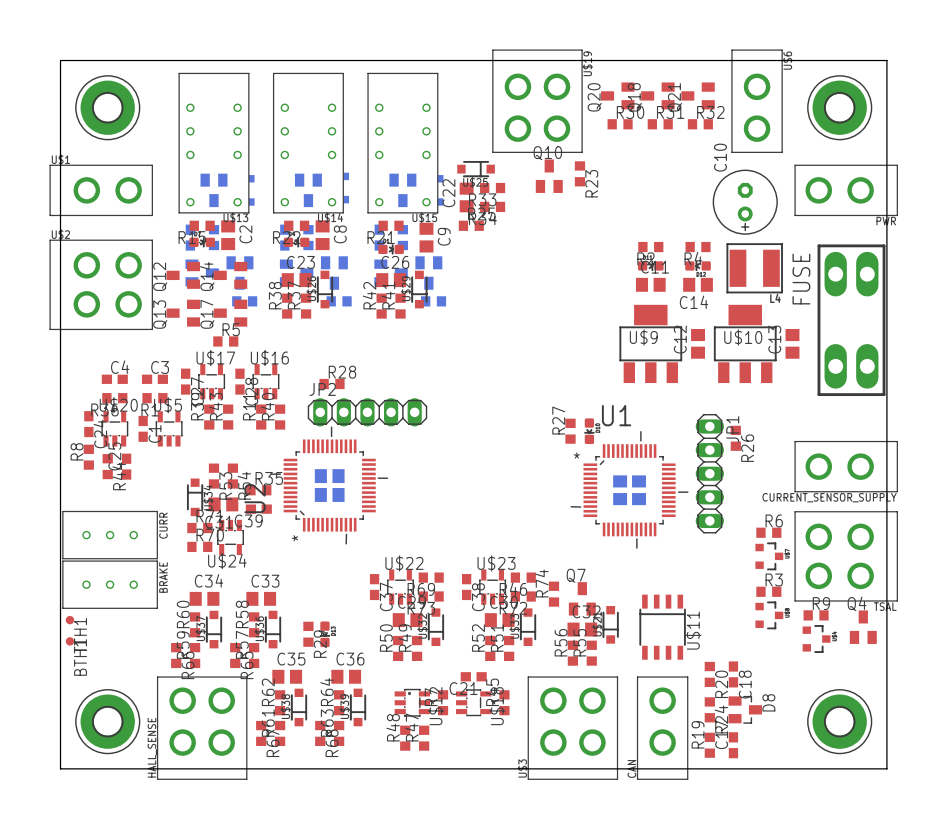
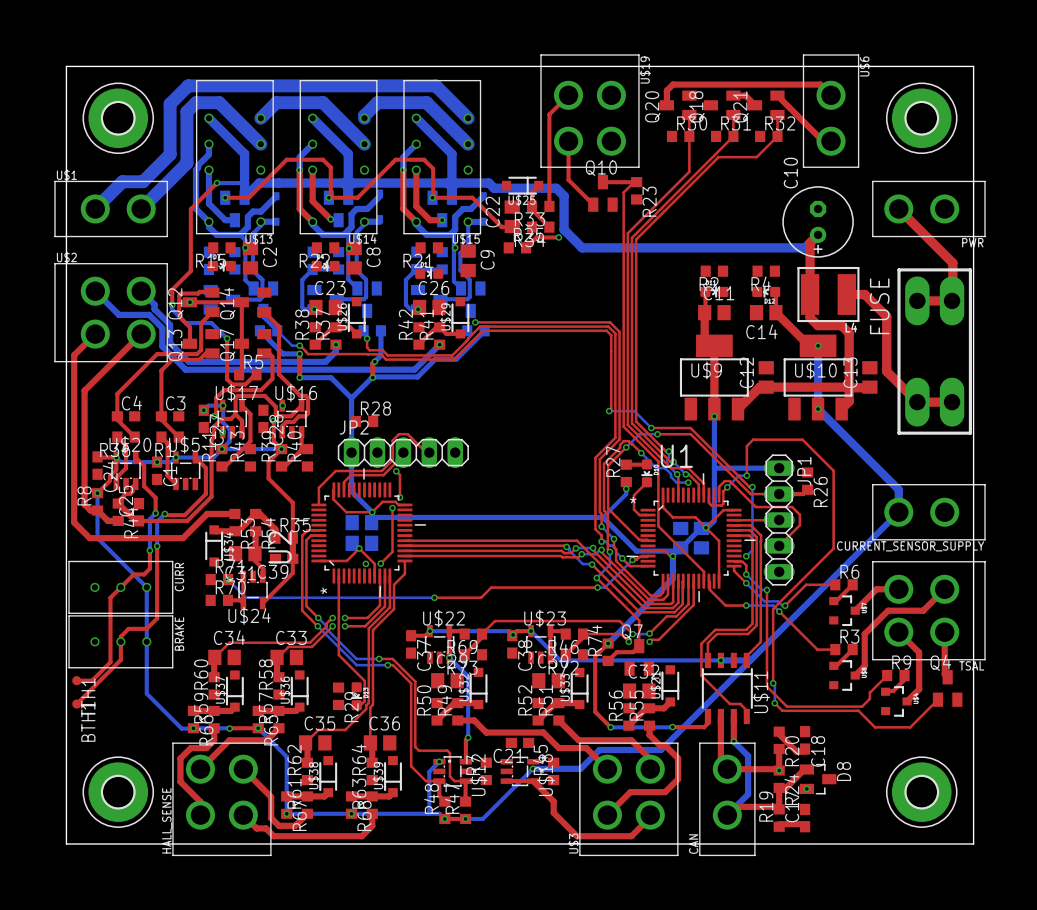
top track: none -> (568, 95) (549, 114) (549, 206)
top track: none -> (831, 95) (820, 84) (672, 84) (666, 90) (666, 105)
top track: none -> (733, 95) (745, 95) (755, 105)
top track: none -> (777, 95) (823, 141) (831, 141)
top track: none -> (689, 115) (689, 136)
top track: none -> (733, 115) (733, 136) (631, 237) (631, 423) (670, 461) (673, 461)
top track: none -> (777, 115) (777, 136) (756, 157) (718, 157) (636, 239) (636, 421) (666, 451) (668, 451)
bottom track: none -> (208, 118) (244, 153) (244, 197) (259, 183) (343, 183) (348, 187)
bottom track: none -> (260, 118) (276, 102) (323, 102) (364, 144)
bottom track: none -> (312, 118) (348, 153) (348, 197)
bottom track: none -> (364, 118) (364, 115) (377, 102) (426, 102) (468, 144)
bottom track: none -> (416, 118) (451, 153) (451, 197)
bottom track: none -> (468, 118) (435, 85) (188, 85) (170, 104) (170, 154) (142, 181) (122, 181) (95, 208)
top track: none -> (689, 136) (689, 171) (627, 233) (627, 424) (671, 468) (688, 468) (704, 483) (703, 495)
top track: none -> (568, 141) (568, 179) (593, 204)
bottom track: none -> (208, 144) (208, 154) (196, 169) (196, 208) (208, 221) (208, 227) (216, 234) (240, 234)
bottom track: none -> (260, 144) (219, 102) (196, 102) (186, 111) (186, 163) (141, 208)
bottom track: none -> (312, 144) (299, 157) (299, 170)
bottom track: none -> (416, 144) (403, 157) (403, 170)
bottom track: none -> (208, 170) (208, 203) (225, 220) (234, 220)
top track: none -> (299, 170) (299, 208) (312, 221)
via: none -> (299, 170)
top track: none -> (312, 170) (312, 201) (330, 219)
top track: none -> (403, 170) (403, 208) (416, 221)
via: none -> (403, 170)
top track: none -> (416, 170) (416, 206) (430, 220) (442, 220)
top track: none -> (602, 182) (634, 182)
top track: none -> (634, 182) (623, 192) (623, 426) (658, 461) (658, 526) (704, 571) (703, 581)
top track: none -> (216, 183) (190, 209) (190, 271) (172, 289) (172, 304)
bottom track: none -> (216, 183) (244, 183)
via: none -> (216, 183)
bottom track: none -> (451, 183) (488, 183) (494, 188) (556, 188) (564, 196) (564, 229) (582, 247) (805, 247) (818, 234)
top track: none -> (538, 185) (532, 192) (532, 209) (549, 227)
bottom track: none -> (348, 187) (352, 183) (447, 183) (451, 188)
bottom track: none -> (276, 196) (261, 211) (253, 211) (247, 216) (247, 227) (240, 234)
bottom track: none -> (380, 196) (367, 208) (356, 208) (351, 214) (351, 227) (343, 234) (323, 234) (312, 224) (312, 221)
bottom track: none -> (483, 196) (470, 208) (462, 208) (455, 216) (455, 229)
top track: none -> (225, 197) (248, 197) (286, 159) (323, 159) (330, 167) (330, 195) (328, 197) (357, 197) (395, 159) (424, 159) (433, 168) (432, 197) (472, 197) (501, 227) (512, 226)
via: none -> (225, 197)
via: none -> (328, 197)
via: none -> (432, 197)
top track: none -> (898, 208) (952, 263) (952, 300) (917, 300)
via: none -> (330, 219)
via: none -> (442, 220)
bottom track: none -> (276, 221) (261, 221) (260, 225) (253, 233) (253, 270) (262, 279) (262, 297) (259, 299) (233, 299)
bottom track: none -> (380, 221) (364, 221) (364, 224) (356, 232) (356, 270) (366, 279) (366, 297) (364, 299) (336, 299)
bottom track: none -> (416, 221) (416, 224) (426, 234) (450, 234) (455, 229)
bottom track: none -> (483, 221) (468, 221) (468, 245) (460, 253) (460, 270) (469, 279) (469, 297) (467, 299) (440, 299)
bottom track: none -> (348, 230) (348, 279) (357, 288)
bottom track: none -> (455, 229) (453, 281) (461, 288)
bottom track: none -> (240, 234) (245, 240) (245, 280) (253, 288)
top track: none -> (818, 234) (810, 242) (810, 317) (818, 325) (841, 325) (849, 333) (849, 401) (841, 409)
top track: none -> (558, 237) (536, 237) (526, 247)
via: none -> (558, 237)
via: none -> (245, 247)
via: none -> (455, 247)
via: none -> (349, 248)
bottom track: none -> (338, 269) (312, 269) (302, 279) (302, 307) (304, 309) (314, 309)
bottom track: none -> (442, 269) (416, 269) (405, 279) (405, 304) (410, 309) (418, 309)
bottom track: none -> (95, 291) (118, 314) (149, 314) (162, 328) (162, 346) (185, 369) (414, 369) (439, 344)
bottom track: none -> (141, 291) (154, 304) (154, 309) (170, 324) (170, 343) (188, 361) (325, 361) (335, 351) (335, 344)
top track: none -> (705, 291) (704, 336) (714, 345) (714, 416)
top track: none -> (775, 291) (775, 312) (809, 345) (818, 345)
top track: none -> (212, 292) (181, 293) (179, 295) (179, 316) (189, 327) (189, 343)
top track: none -> (846, 294) (864, 294) (886, 316) (886, 371) (917, 402) (952, 402)
top track: none -> (189, 302) (241, 302) (241, 372) (239, 374)
via: none -> (189, 302)
bottom track: none -> (172, 304) (172, 309) (185, 323) (211, 323) (227, 338)
via: none -> (172, 304)
via: none -> (314, 309)
via: none -> (418, 309)
bottom track: none -> (263, 310) (263, 316) (292, 345) (299, 345)
top track: none -> (212, 311) (201, 323) (201, 349) (196, 354) (157, 354) (117, 393) (117, 419) (134, 437)
top track: none -> (264, 311) (278, 326) (278, 374) (300, 395) (308, 398) (308, 413) (305, 416) (299, 416) (293, 422) (286, 422) (282, 426) (282, 432)
top track: none -> (475, 322) (610, 322) (619, 331) (619, 439) (599, 459) (601, 526)
via: none -> (475, 322)
bottom track: none -> (259, 330) (283, 353) (299, 353)
bottom track: none -> (380, 330) (380, 355) (374, 361)
bottom track: none -> (484, 330) (456, 359) (435, 359) (417, 376) (372, 376)
top track: none -> (95, 334) (74, 355) (74, 522) (89, 538) (183, 538) (207, 513) (234, 513)
top track: none -> (141, 334) (84, 390) (84, 504) (90, 510) (97, 510) (107, 520) (118, 520)
top track: none -> (356, 333) (350, 327) (332, 327) (315, 344)
top track: none -> (460, 333) (446, 333) (439, 327) (436, 327) (418, 344)
top track: none -> (227, 338) (227, 379) (232, 384) (245, 384) (256, 374)
via: none -> (227, 338)
top track: none -> (367, 338) (367, 347) (369, 350) (382, 350) (387, 355) (452, 355) (480, 326) (608, 326) (615, 333) (615, 437) (595, 457) (595, 529) (601, 535) (601, 541)
via: none -> (367, 338)
via: none -> (335, 344)
via: none -> (439, 344)
top track: none -> (299, 345) (308, 354) (380, 354) (386, 359) (454, 359) (482, 330) (606, 330) (611, 335) (611, 409) (609, 411)
via: none -> (299, 345)
bottom track: none -> (818, 345) (818, 409) (898, 489) (898, 512) (661, 749) (599, 749) (580, 768) (532, 768) (482, 818) (465, 818)
via: none -> (818, 345)
top track: none -> (212, 353) (205, 353) (199, 359) (172, 359) (161, 370) (161, 419) (178, 437)
top track: none -> (264, 353) (269, 353) (272, 356) (272, 378) (261, 390) (224, 390) (216, 398) (216, 414) (214, 416)
top track: none -> (299, 353) (299, 377)
via: none -> (299, 353)
top track: none -> (374, 361) (372, 363) (372, 377)
via: none -> (374, 361)
bottom track: none -> (372, 376) (351, 398)
bottom track: none -> (299, 377) (331, 377) (351, 398)
via: none -> (299, 377)
via: none -> (372, 377)
top track: none -> (869, 387) (759, 387) (737, 409)
bottom track: none -> (351, 398) (351, 491) (372, 512) (371, 517) (602, 517)
via: none -> (223, 405)
top track: none -> (242, 405) (250, 414) (250, 441) (225, 466) (221, 466)
via: none -> (282, 405)
top track: none -> (301, 405) (290, 416) (278, 415)
via: none -> (818, 409)
bottom track: none -> (203, 410) (208, 405) (223, 405) (223, 422) (229, 429) (229, 441) (213, 457) (175, 457) (171, 462) (120, 462) (116, 457)
via: none -> (203, 410)
bottom track: none -> (609, 411) (634, 411) (651, 428)
via: none -> (609, 411)
top track: none -> (235, 414) (242, 420) (242, 432)
top track: none -> (235, 414) (235, 398) (237, 395) (264, 395) (275, 406) (275, 413) (277, 415)
top track: none -> (235, 414) (231, 418) (221, 418) (214, 426) (214, 437) (211, 439) (211, 496) (187, 520) (135, 520) (118, 503)
via: none -> (214, 416)
bottom track: none -> (714, 416) (714, 520) (706, 528) (701, 527) (678, 551) (636, 551) (602, 517)
via: none -> (714, 416)
top track: none -> (273, 420) (273, 441) (281, 449) (268, 462) (268, 478) (292, 502) (292, 573) (262, 603)
via: none -> (273, 420)
top track: none -> (651, 428) (690, 428) (749, 487) (752, 487)
via: none -> (651, 428)
via: none -> (222, 432)
top track: none -> (301, 432) (302, 449) (284, 466) (281, 466)
top track: none -> (657, 434) (690, 434) (750, 494) (803, 494) (807, 489)
bottom track: none -> (657, 434) (639, 434) (626, 447)
via: none -> (657, 434)
top track: none -> (117, 437) (126, 445) (126, 468) (116, 477) (116, 484)
top track: none -> (161, 437) (167, 443) (167, 475) (175, 484)
top track: none -> (626, 447) (608, 465) (608, 508) (639, 539) (648, 540)
via: none -> (626, 447)
bottom track: none -> (221, 449) (281, 449)
via: none -> (221, 449)
via: none -> (281, 449)
bottom track: none -> (668, 451) (667, 464) (677, 474)
via: none -> (668, 451)
top track: none -> (403, 452) (383, 475) (351, 475) (344, 482) (344, 489)
top track: none -> (429, 452) (426, 452) (407, 434) (398, 434) (392, 440) (392, 460) (381, 471) (335, 471) (318, 487) (318, 504)
top track: none -> (641, 453) (628, 441) (623, 441) (620, 447) (603, 463) (603, 510) (607, 514) (607, 549) (609, 551)
bottom track: none -> (641, 453) (656, 468) (665, 468) (676, 482) (688, 482)
via: none -> (641, 453)
top track: none -> (97, 456) (116, 457) (116, 469) (109, 476) (109, 480) (97, 493)
via: none -> (116, 457)
top track: none -> (135, 457) (144, 465) (144, 486) (155, 497) (155, 513)
via: none -> (175, 457)
top track: none -> (195, 457) (205, 468) (205, 494) (184, 515) (164, 513)
R39 position: (209, 417) -> (281, 457)
R11 position: (261, 417) -> (221, 457)
via: none -> (157, 462)
bottom track: none -> (673, 461) (685, 474)
via: none -> (673, 461)
top track: none -> (647, 464) (626, 464)
bottom track: none -> (714, 468) (779, 468)
top track: none -> (396, 471) (399, 474) (399, 497)
via: none -> (396, 471)
top track: none -> (677, 474) (678, 495)
via: none -> (677, 474)
top track: none -> (685, 474) (688, 474) (698, 484) (698, 495)
via: none -> (685, 474)
top track: none -> (746, 475) (746, 446) (753, 439) (802, 439) (833, 470) (833, 548) (773, 608) (773, 683)
bottom track: none -> (746, 475) (738, 475) (727, 487)
via: none -> (746, 475)
top track: none -> (647, 482) (634, 495) (634, 509) (639, 515) (648, 515)
via: none -> (688, 482)
top track: none -> (135, 484) (132, 487) (132, 491) (125, 493) (120, 499) (120, 505)
top track: none -> (727, 487) (723, 491) (721, 505) (711, 505) (708, 502) (708, 495)
via: none -> (727, 487)
bottom track: none -> (752, 487) (752, 550) (746, 556)
via: none -> (752, 487)
bottom track: none -> (626, 488) (626, 494) (602, 517)
via: none -> (626, 488)
top track: none -> (333, 489) (333, 499) (346, 512) (372, 512) (382, 501) (395, 501) (398, 504) (404, 504)
bottom track: none -> (97, 493) (97, 538) (146, 587) (146, 693) (181, 728) (229, 728)
via: none -> (97, 493)
top track: none -> (663, 495) (663, 507) (672, 517) (695, 517) (719, 540) (719, 581)
top track: none -> (719, 495) (719, 486) (724, 481) (729, 481) (755, 507) (792, 507) (799, 514) (799, 525) (779, 545)
via: none -> (399, 497)
top track: none -> (392, 508) (392, 551) (380, 563)
via: none -> (392, 508)
top track: none -> (734, 510) (723, 510) (705, 527)
via: none -> (372, 512)
bottom track: none -> (155, 513) (149, 519) (149, 550)
via: none -> (155, 513)
bottom track: none -> (164, 513) (157, 521) (157, 546)
via: none -> (164, 513)
top track: none -> (779, 520) (734, 520)
top track: none -> (734, 525) (750, 525) (761, 535) (760, 642) (746, 656) (746, 660)
bottom track: none -> (601, 526) (614, 539)
via: none -> (601, 526)
via: none -> (705, 527)
top track: none -> (214, 529) (238, 531) (255, 513) (259, 513) (275, 529) (275, 538)
top track: none -> (255, 531) (254, 560) (263, 569) (262, 576)
top track: none -> (318, 530) (307, 530) (302, 535) (302, 610) (317, 626)
top track: none -> (734, 530) (750, 530) (756, 537) (756, 625) (748, 634) (716, 634) (707, 643) (707, 660)
top track: none -> (318, 535) (311, 535) (306, 540) (306, 606) (318, 617)
top track: none -> (734, 535) (749, 535) (752, 538) (752, 623) (746, 629) (715, 629) (701, 643) (701, 675) (729, 704) (740, 704) (746, 710) (746, 716)
top track: none -> (614, 539) (616, 561) (650, 595) (659, 595) (663, 592) (663, 581)
via: none -> (614, 539)
top track: none -> (404, 540) (577, 540) (644, 608) (672, 608) (678, 602) (678, 581)
bottom track: none -> (601, 541) (612, 545) (622, 558)
via: none -> (601, 541)
top track: none -> (157, 546) (157, 618) (146, 628) (128, 628) (120, 636) (120, 659) (76, 704)
via: none -> (157, 546)
top track: none -> (404, 545) (566, 546)
bottom track: none -> (566, 546) (582, 564) (592, 564)
via: none -> (566, 546)
via: none -> (359, 548)
top track: none -> (575, 548) (571, 553) (564, 553) (561, 550) (404, 550)
via: none -> (575, 548)
top track: none -> (593, 548) (647, 603) (671, 603) (673, 602) (673, 581)
bottom track: none -> (593, 548) (575, 548)
via: none -> (593, 548)
bottom track: none -> (681, 547) (675, 547) (675, 553) (672, 556) (672, 578) (608, 643)
top track: none -> (601, 549) (601, 552) (649, 599) (663, 599) (668, 594) (668, 581)
bottom track: none -> (601, 549) (595, 554) (581, 554)
via: none -> (601, 549)
top track: none -> (149, 550) (149, 568) (144, 574) (133, 574) (110, 597) (110, 662) (92, 680) (76, 680)
via: none -> (149, 550)
top track: none -> (648, 550) (664, 550) (672, 556)
bottom track: none -> (609, 551) (609, 564) (596, 578)
via: none -> (609, 551)
top track: none -> (581, 554) (578, 557) (404, 556)
via: none -> (581, 554)
top track: none -> (648, 556) (632, 559)
via: none -> (672, 556)
via: none -> (746, 556)
top track: none -> (622, 558) (630, 566) (648, 566)
via: none -> (622, 558)
bottom track: none -> (632, 559) (604, 587) (597, 587)
via: none -> (632, 559)
top track: none -> (318, 560) (346, 560) (359, 548) (374, 563) (374, 575)
top track: none -> (404, 560) (404, 573) (394, 584) (394, 609) (372, 630) (372, 704) (370, 707) (372, 762)
top track: none -> (734, 561) (742, 561) (746, 565) (746, 574)
via: none -> (365, 563)
via: none -> (380, 563)
top track: none -> (592, 564) (639, 612) (674, 612) (682, 604) (683, 581)
via: none -> (592, 564)
top track: none -> (734, 566) (734, 570) (746, 583)
bottom track: none -> (746, 574) (761, 589) (766, 589)
via: none -> (746, 574)
top track: none -> (338, 575) (338, 655) (364, 680) (364, 701) (360, 705) (356, 705)
top track: none -> (379, 575) (380, 605) (367, 618) (345, 618)
top track: none -> (384, 575) (384, 606) (365, 626) (345, 626)
top track: none -> (389, 575) (389, 607) (368, 628) (368, 702) (366, 709) (345, 729) (318, 729) (305, 742) (307, 744) (307, 762)
top track: none -> (243, 576) (243, 603) (240, 600) (228, 600)
top track: none -> (596, 578) (639, 620) (639, 646) (633, 652) (616, 652) (608, 660)
via: none -> (596, 578)
bottom track: none -> (228, 579) (246, 597) (434, 597)
via: none -> (228, 579)
top track: none -> (688, 581) (688, 604) (676, 616) (666, 616) (649, 633)
top track: none -> (693, 581) (693, 604) (658, 639) (651, 639) (649, 641)
top track: none -> (708, 581) (709, 589) (725, 605) (746, 605)
bottom track: none -> (746, 583) (764, 601) (777, 601) (785, 605)
via: none -> (746, 583)
top track: none -> (835, 584) (806, 584) (785, 605)
top track: none -> (852, 584) (836, 601) (833, 601)
top track: none -> (597, 587) (491, 587) (481, 597) (434, 597)
via: none -> (597, 587)
top track: none -> (898, 589) (876, 589) (855, 610)
top track: none -> (944, 589) (923, 610) (888, 610) (864, 634) (864, 666) (855, 675)
top track: none -> (766, 589) (766, 686) (786, 706) (862, 706) (869, 698) (869, 692) (887, 675)
via: none -> (766, 589)
via: none -> (434, 597)
bottom track: none -> (746, 605) (773, 605) (779, 611)
via: none -> (746, 605)
via: none -> (785, 605)
top track: none -> (779, 611) (817, 649) (835, 649)
via: none -> (779, 611)
bottom track: none -> (318, 617) (356, 658) (379, 658)
via: none -> (318, 617)
top track: none -> (332, 618) (310, 642) (229, 642) (214, 658) (214, 677)
via: none -> (332, 618)
via: none -> (345, 618)
bottom track: none -> (317, 626) (356, 665) (387, 665)
via: none -> (317, 626)
top track: none -> (332, 626) (312, 646) (288, 646) (277, 657) (277, 675) (278, 677)
via: none -> (332, 626)
via: none -> (345, 626)
top track: none -> (429, 631) (425, 635) (411, 635)
bottom track: none -> (429, 631) (509, 631) (513, 634)
via: none -> (429, 631)
top track: none -> (531, 631) (516, 631) (512, 635)
bottom track: none -> (531, 631) (560, 660) (750, 660)
via: none -> (531, 631)
top track: none -> (898, 632) (919, 652) (919, 689) (907, 701)
top track: none -> (944, 632) (944, 674) (947, 677)
top track: none -> (464, 634) (461, 631) (449, 631) (449, 657)
top track: none -> (565, 634) (562, 631) (550, 631) (550, 657)
top track: none -> (632, 634) (619, 621) (494, 621) (464, 654)
via: none -> (632, 634)
bottom track: none -> (649, 633) (632, 634)
via: none -> (649, 633)
via: none -> (513, 634)
top track: none -> (628, 641) (621, 634) (583, 634) (583, 637) (565, 654)
via: none -> (628, 641)
via: none -> (649, 641)
top track: none -> (608, 643) (595, 656) (595, 711) (610, 727)
via: none -> (608, 643)
top track: none -> (852, 649) (836, 665) (833, 665)
bottom track: none -> (449, 657) (468, 676) (468, 737)
via: none -> (449, 657)
top track: none -> (379, 658) (392, 658) (415, 681) (415, 747) (418, 750) (447, 750) (450, 753) (450, 776) (454, 781) (465, 781) (465, 801)
via: none -> (379, 658)
via: none -> (720, 660)
top track: none -> (387, 665) (393, 665) (411, 683) (411, 766) (426, 781) (439, 781) (439, 796) (444, 801)
via: none -> (387, 665)
top track: none -> (904, 675) (904, 679) (893, 691) (885, 691)
bottom track: none -> (773, 683) (774, 684) (774, 703)
via: none -> (773, 683)
top track: none -> (937, 699) (910, 727) (875, 727) (858, 710) (782, 710) (774, 703)
top track: none -> (670, 701) (663, 708) (646, 708) (628, 725)
via: none -> (774, 703)
top track: none -> (478, 704) (454, 703) (437, 720)
top track: none -> (579, 704) (555, 703) (538, 720)
top track: none -> (234, 707) (231, 710) (193, 710)
top track: none -> (299, 707) (295, 710) (258, 710)
top track: none -> (707, 716) (707, 723) (704, 727) (672, 727)
top track: none -> (720, 716) (720, 762) (727, 769) (779, 770) (779, 751)
top track: none -> (733, 716) (733, 741)
top track: none -> (457, 720) (474, 720) (486, 732) (543, 732) (558, 748) (586, 748) (607, 769)
top track: none -> (558, 720) (578, 740) (631, 740) (650, 759) (650, 769)
top track: none -> (649, 725) (649, 735) (659, 745) (665, 745) (678, 758) (678, 779) (665, 792) (630, 792) (607, 815)
via: none -> (610, 727)
bottom track: none -> (672, 727) (610, 727)
via: none -> (672, 727)
via: none -> (193, 728)
top track: none -> (214, 728) (214, 740) (206, 748) (190, 748) (180, 758) (180, 781) (200, 801) (200, 815)
via: none -> (229, 728)
top track: none -> (258, 728) (229, 728)
bottom track: none -> (258, 728) (286, 756) (286, 813) (439, 813) (444, 818)
via: none -> (258, 728)
top track: none -> (278, 728) (266, 740) (229, 740) (200, 769)
top track: none -> (779, 734) (796, 751) (805, 751)
top track: none -> (468, 737) (465, 740) (465, 761)
via: none -> (468, 737)
bottom track: none -> (733, 741) (748, 755) (748, 794) (727, 815)
via: none -> (733, 741)
bottom track: none -> (439, 761) (429, 771) (429, 813)
via: none -> (439, 761)
top track: none -> (243, 769) (271, 797) (271, 818) (278, 825) (295, 825) (307, 813)
via: none -> (532, 768)
via: none -> (779, 770)
top track: none -> (806, 769) (804, 769) (786, 787) (779, 787) (779, 806) (735, 806) (727, 815)
top track: none -> (506, 781) (533, 781) (553, 801) (553, 812) (577, 836) (631, 836) (650, 817) (650, 815)
via: none -> (806, 788)
top track: none -> (328, 792) (324, 796) (286, 796)
top track: none -> (393, 792) (389, 796) (351, 796)
via: none -> (286, 813)
via: none -> (351, 813)
top track: none -> (372, 813) (372, 825) (361, 836) (273, 836) (266, 828) (256, 828) (243, 815)
top track: none -> (444, 818) (465, 818)
via: none -> (444, 818)
via: none -> (465, 818)
top track: none -> (779, 824) (805, 824)

